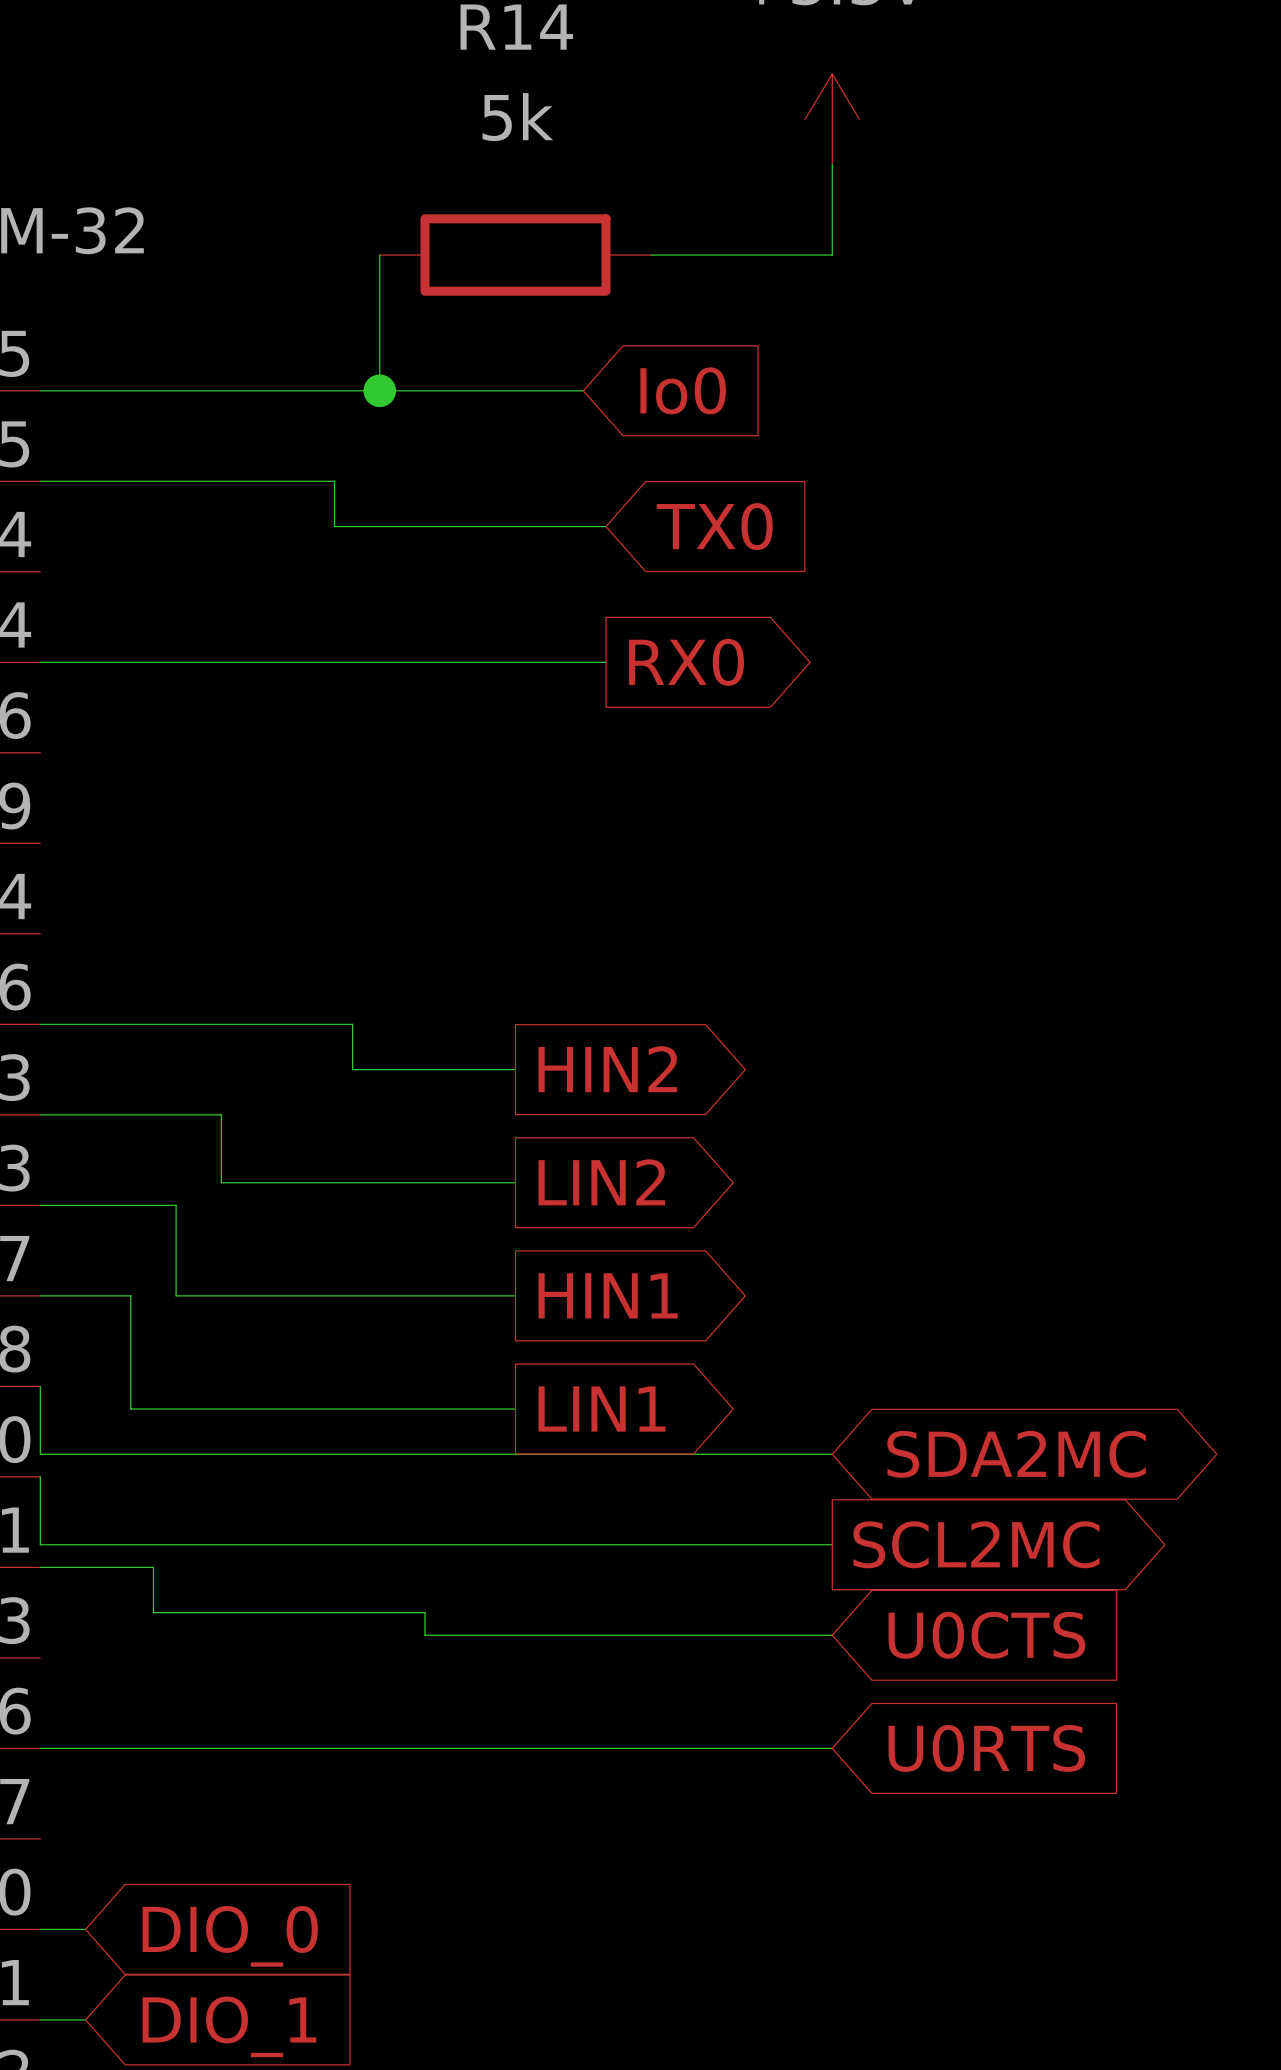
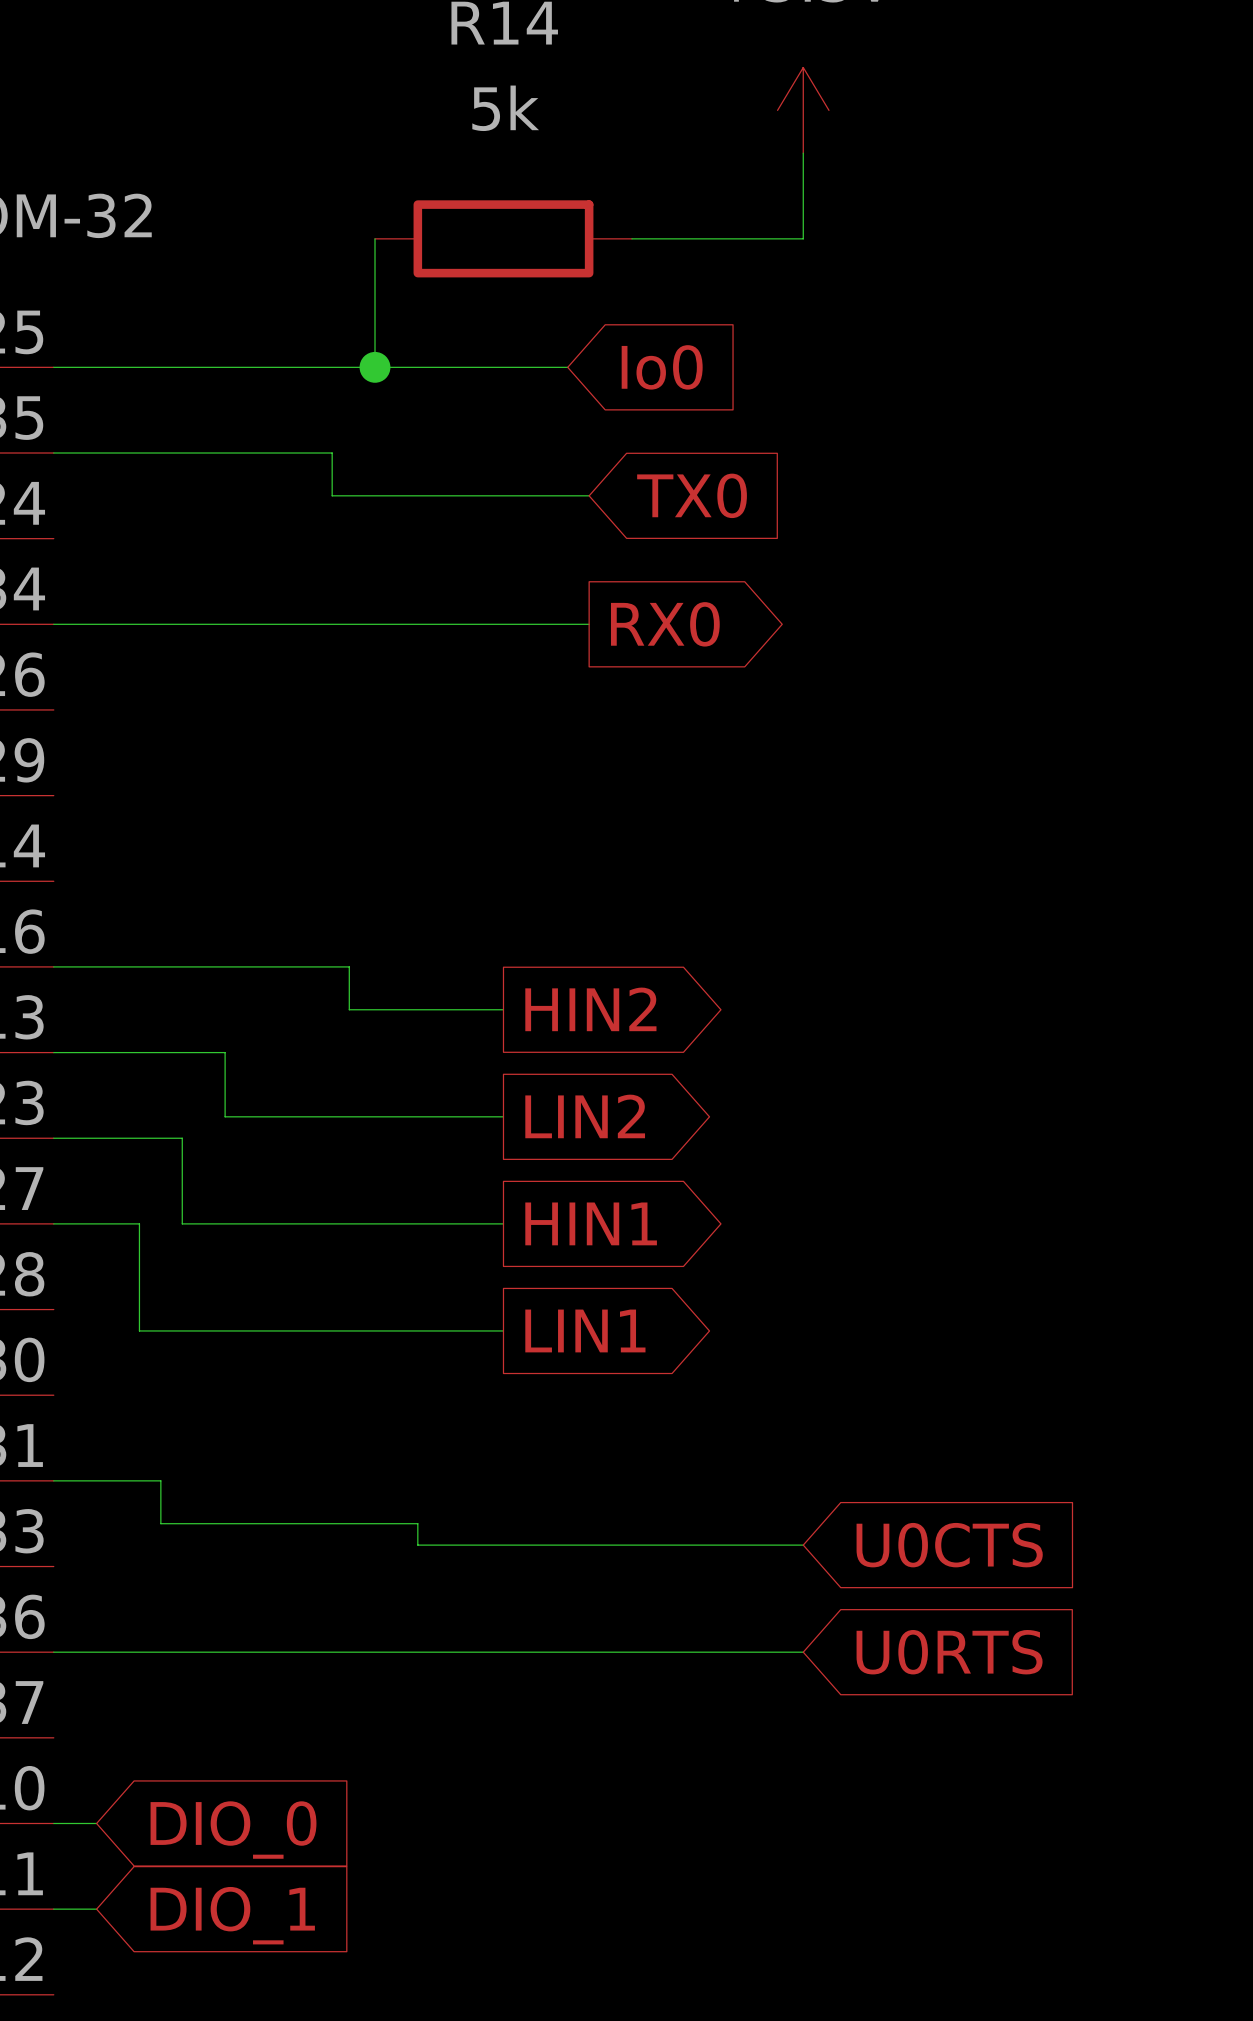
wire: (40, 1386) (40, 1454) (832, 1454) -> none
global label: SDA2MC (1016, 1454) -> none
wire: (40, 1476) (40, 1544) (832, 1544) -> none
global label: SCL2MC (976, 1544) -> none

